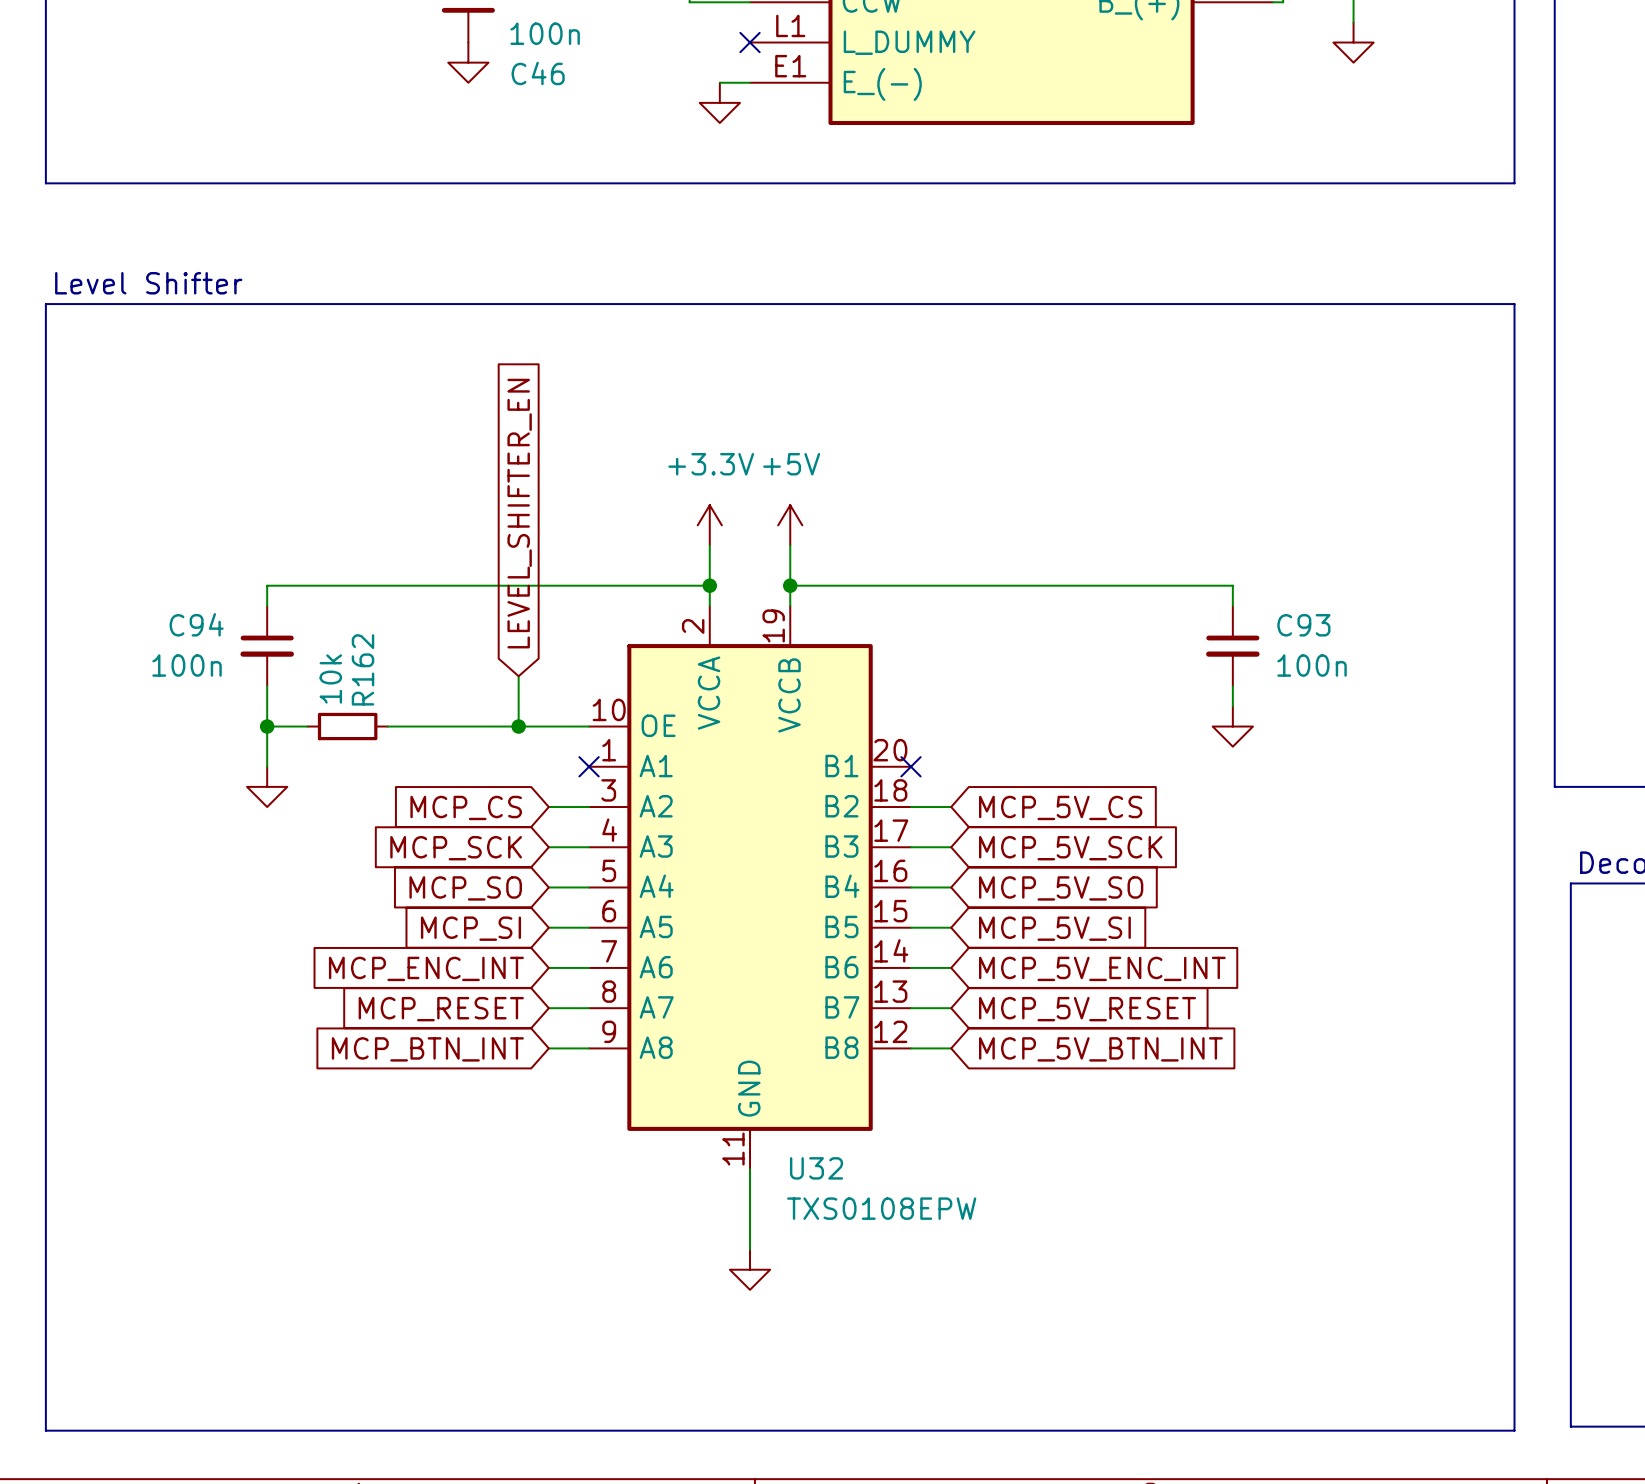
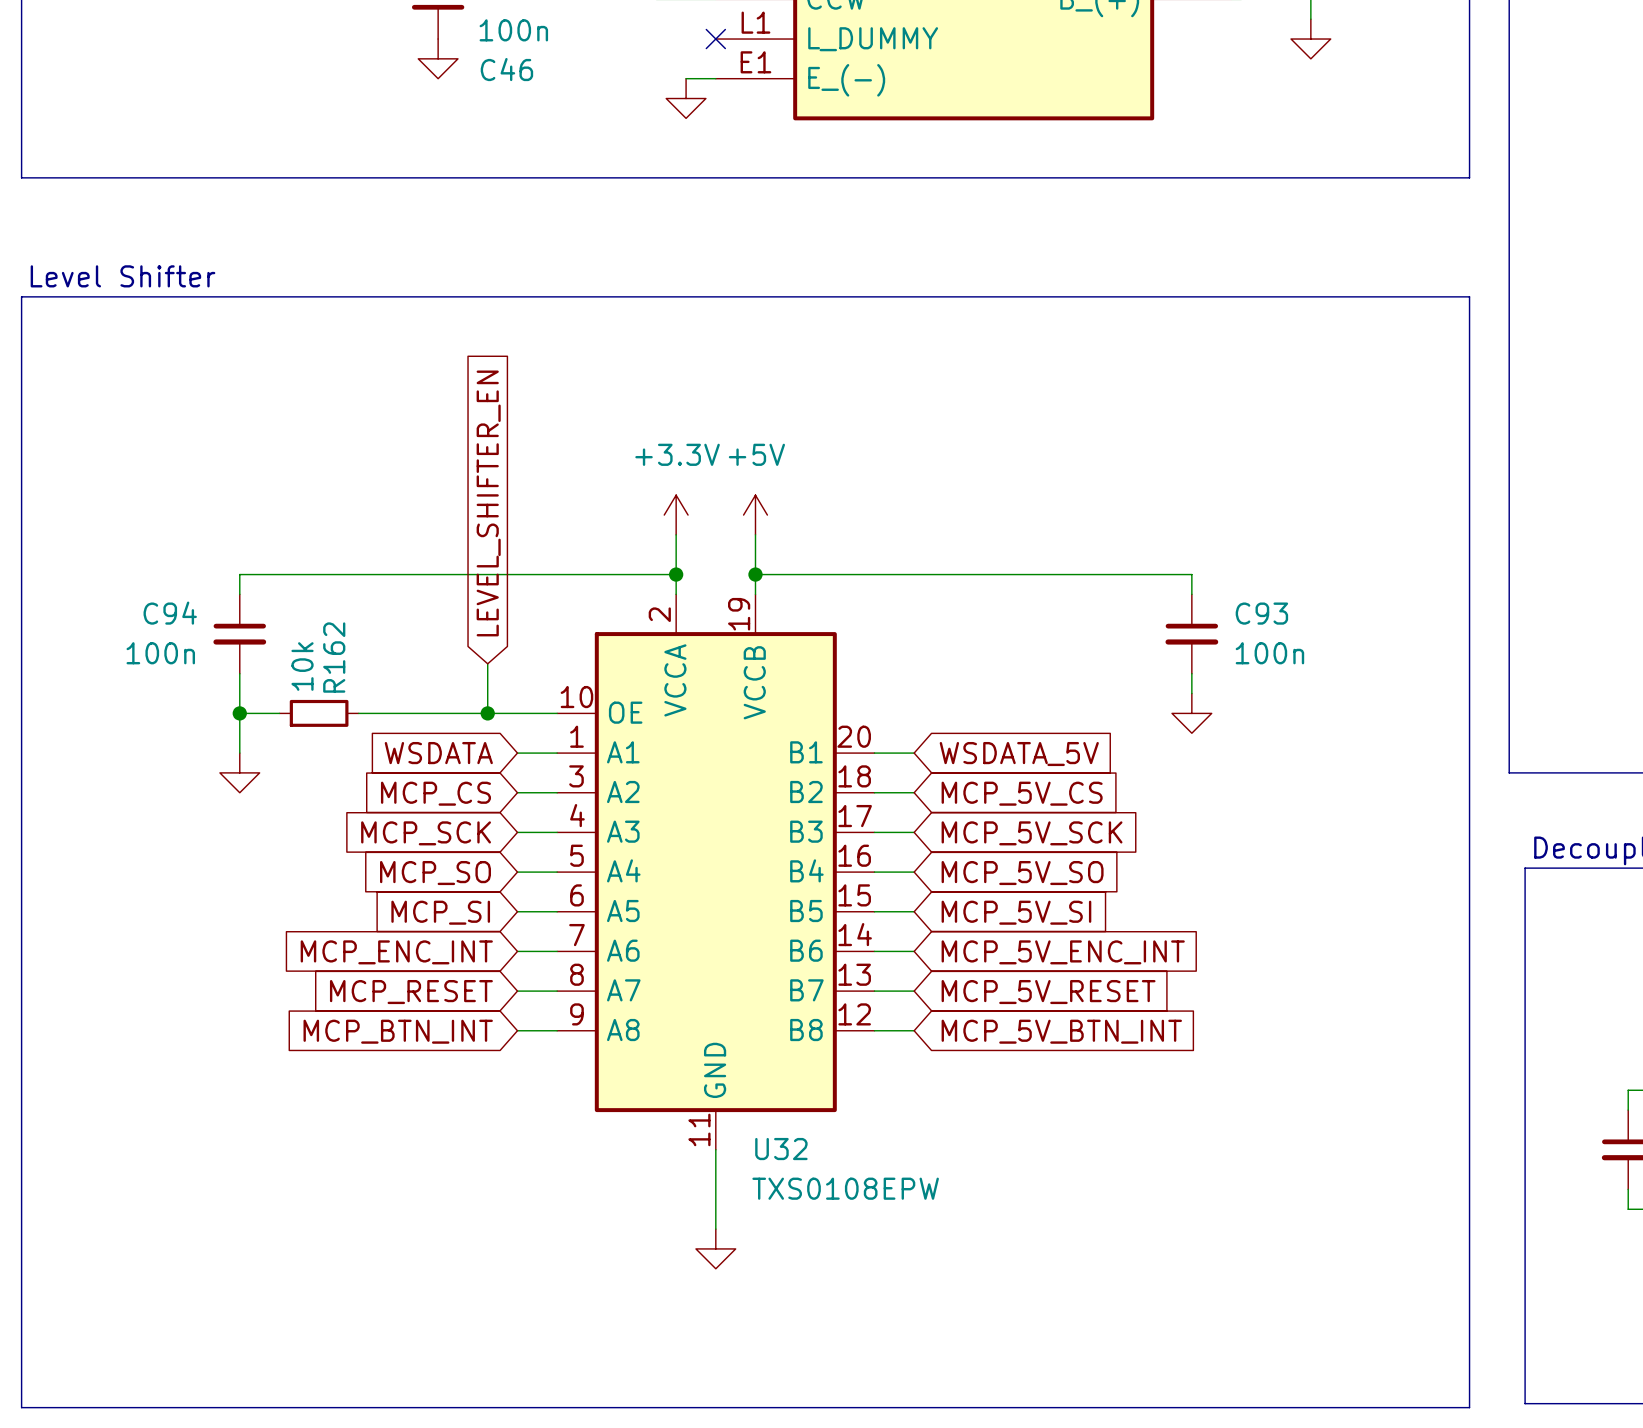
global label: none -> WSDATA (438, 753)
wire: none -> (517, 753) (557, 753)
no-connect mark: (589, 766) -> none
wire: none -> (874, 753) (914, 753)
no-connect mark: (910, 766) -> none
global label: none -> WSDATA_5V (1019, 754)

